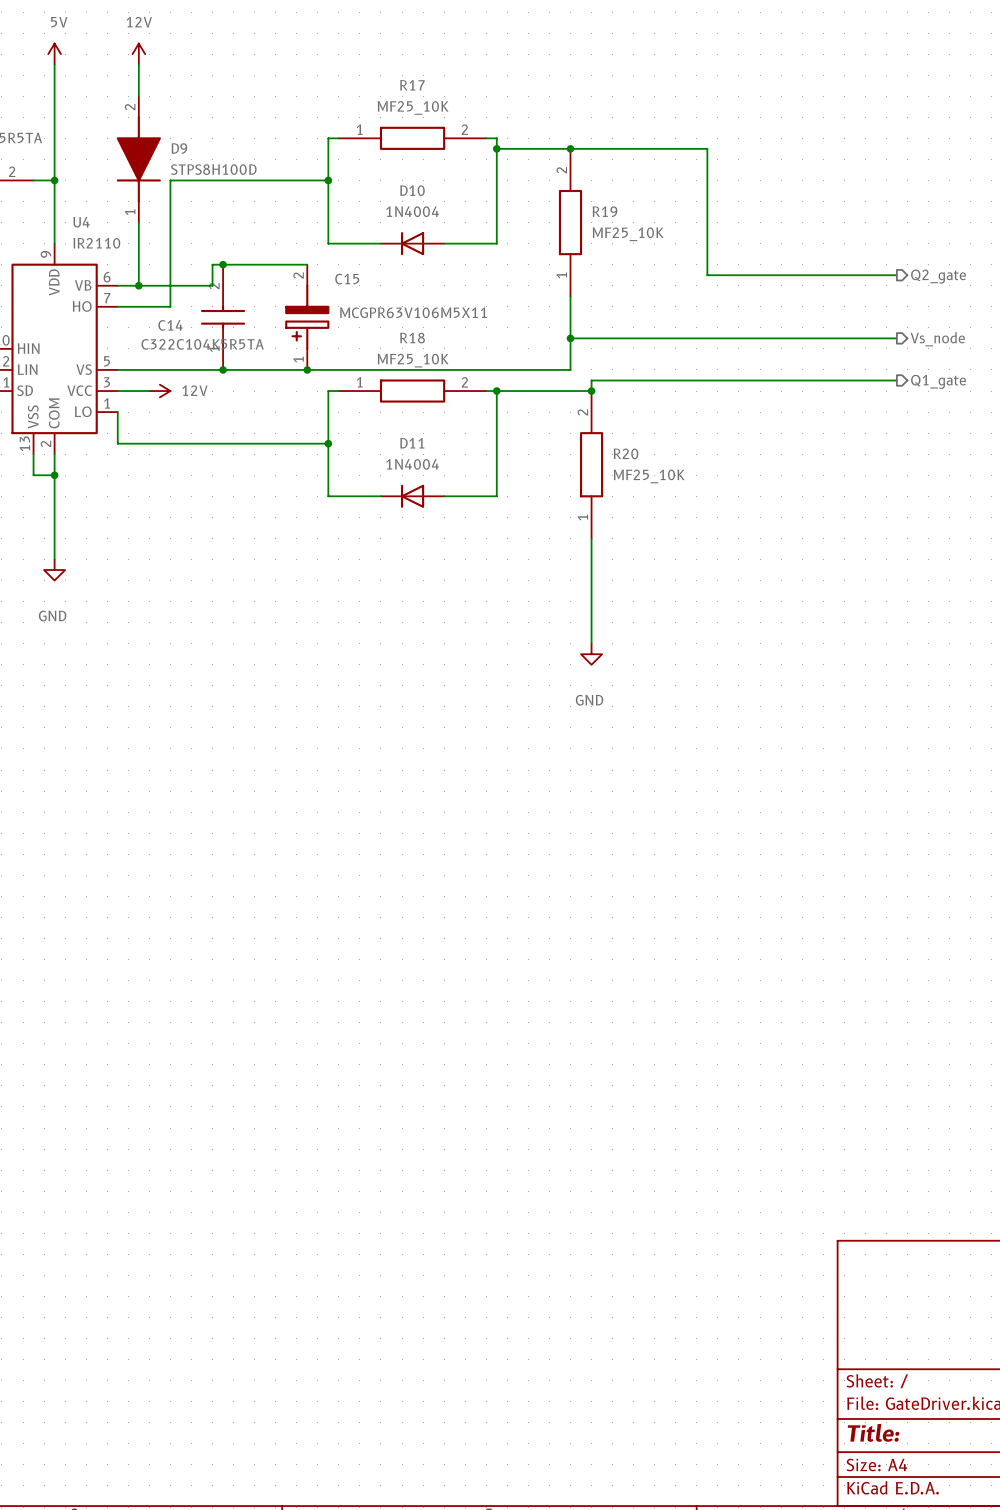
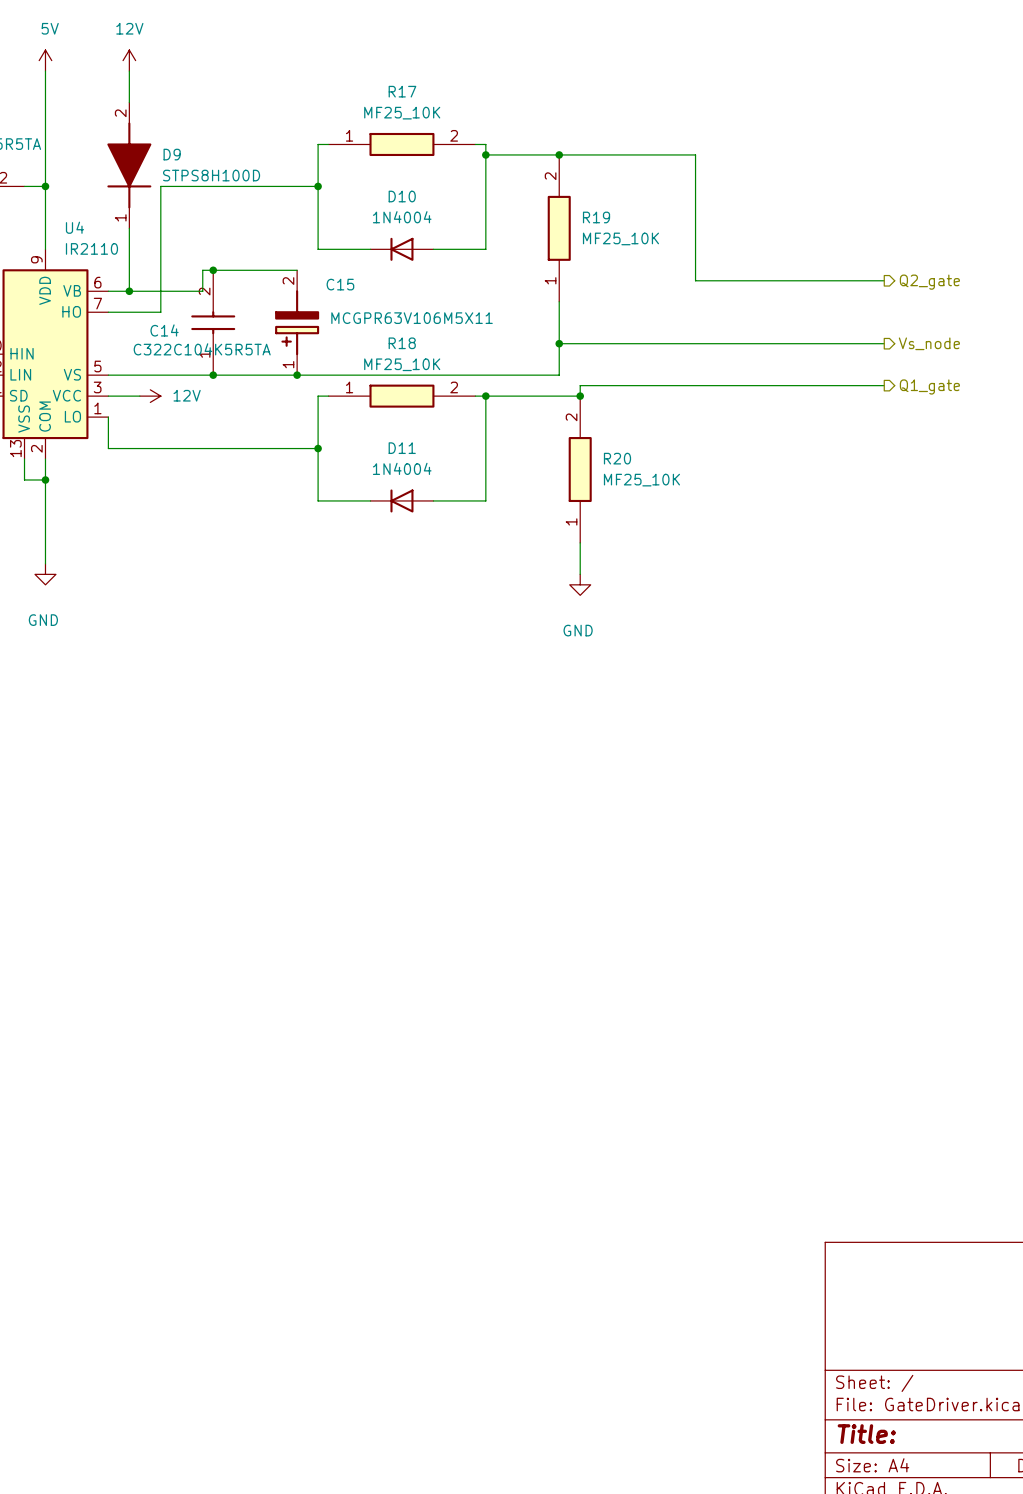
wire: (591, 570) (591, 643) -> none
power symbol position: GND (591, 654) -> GND (580, 584)

